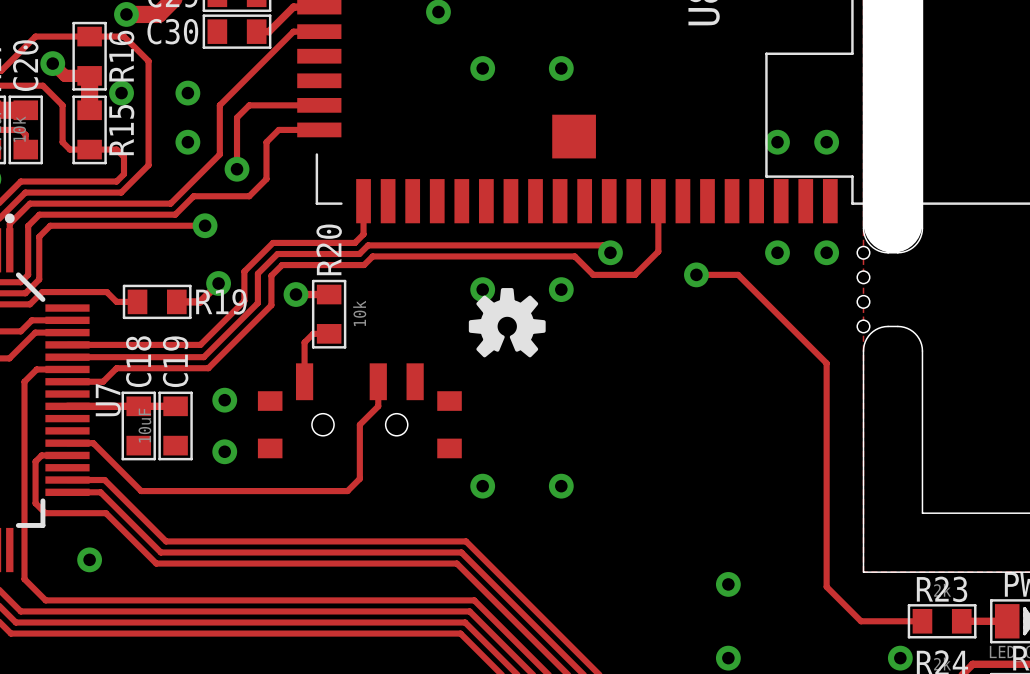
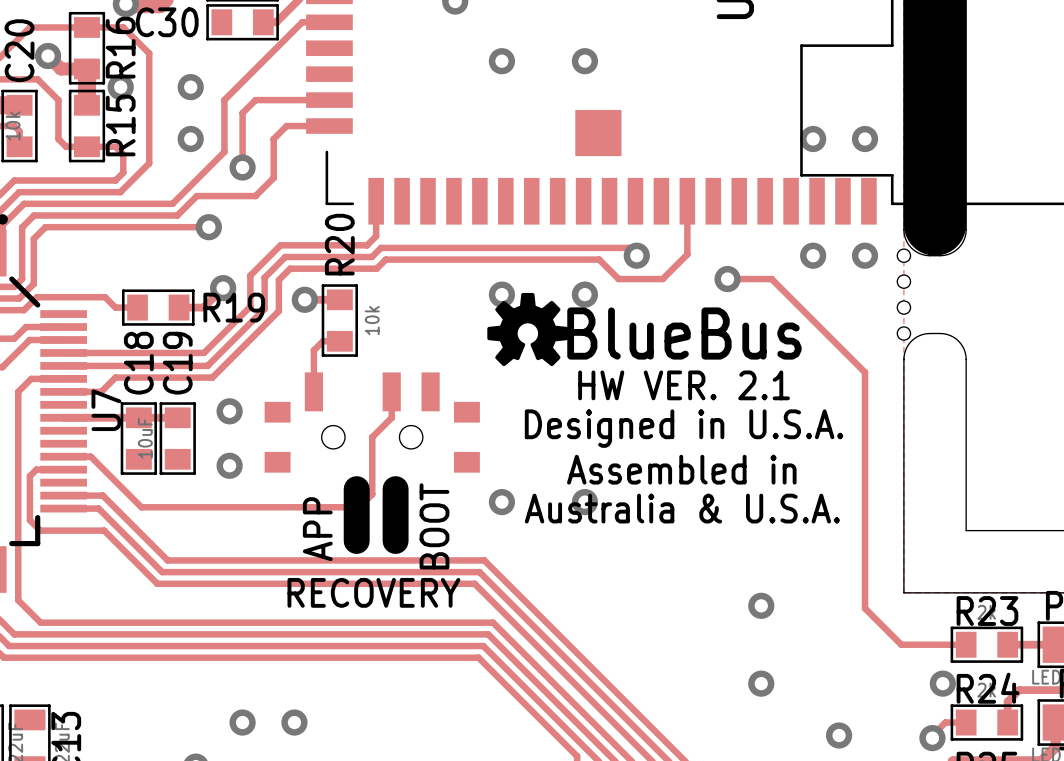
text: none -> BlueBus (684, 333)
text: none -> HW VER. 2.1 (684, 385)
text: none -> Designed in U.S.A. (684, 428)
text: none -> Assembled in (681, 469)
line: none -> (356, 489) (356, 540)
line: none -> (395, 489) (395, 540)
text: none -> Australia & U.S.A. (682, 508)
text: none -> BOOT (434, 526)
text: none -> APP (317, 529)
via: (89, 559) -> none
text: none -> RECOVERY (373, 592)

